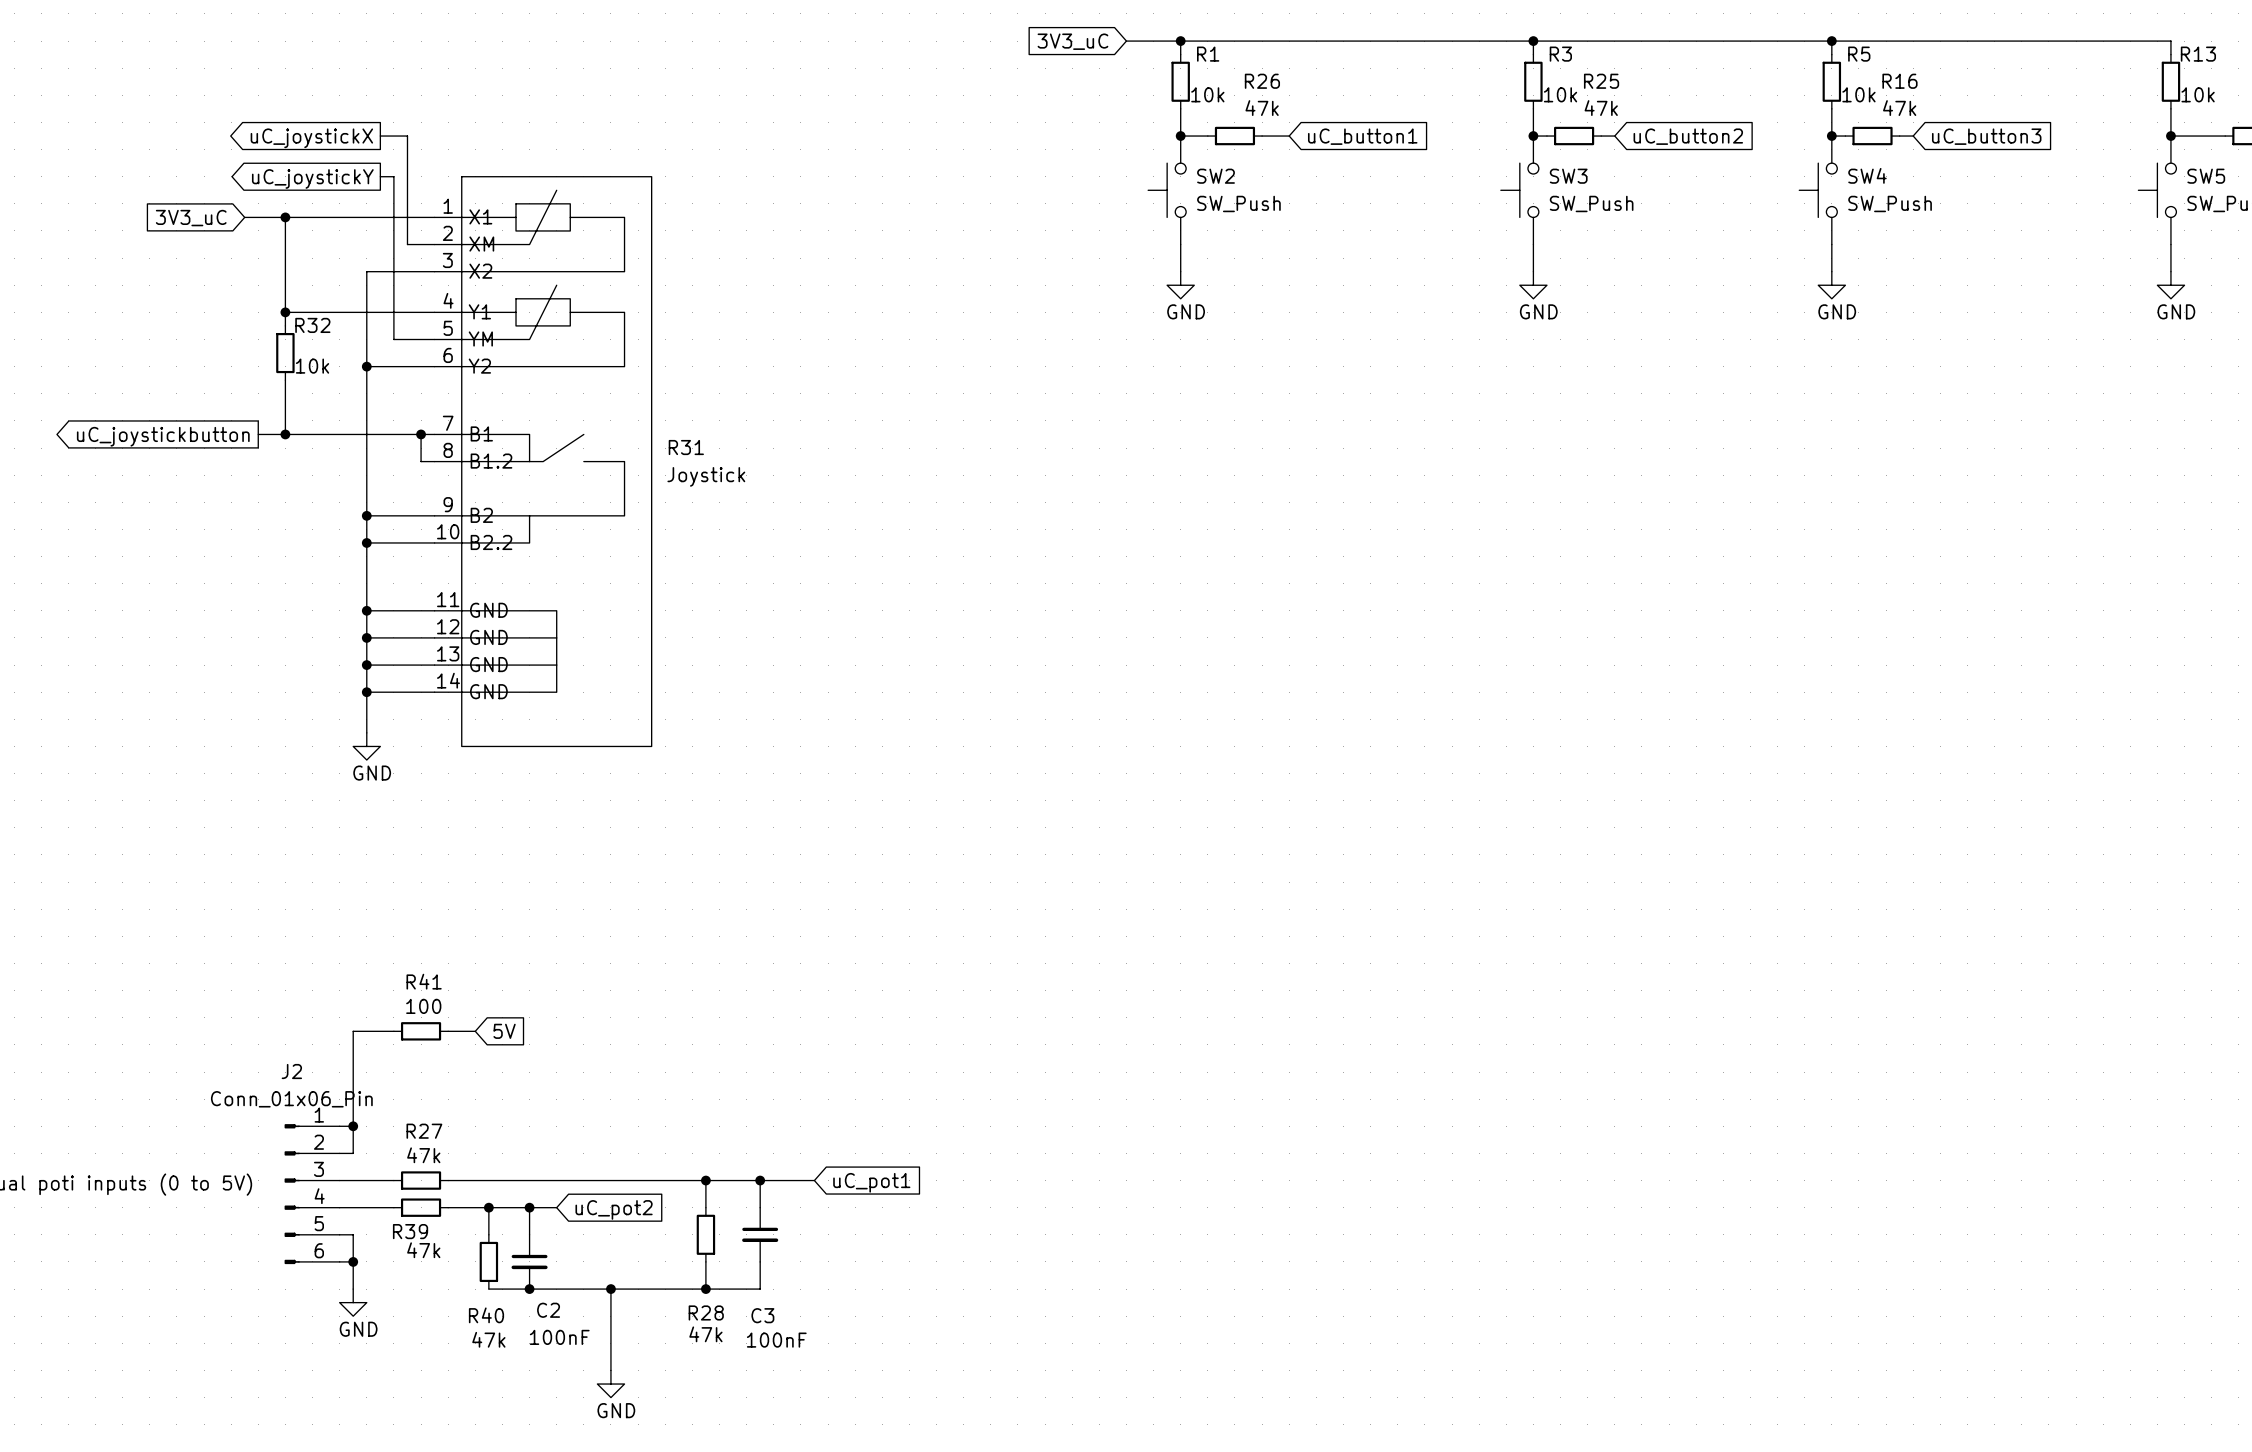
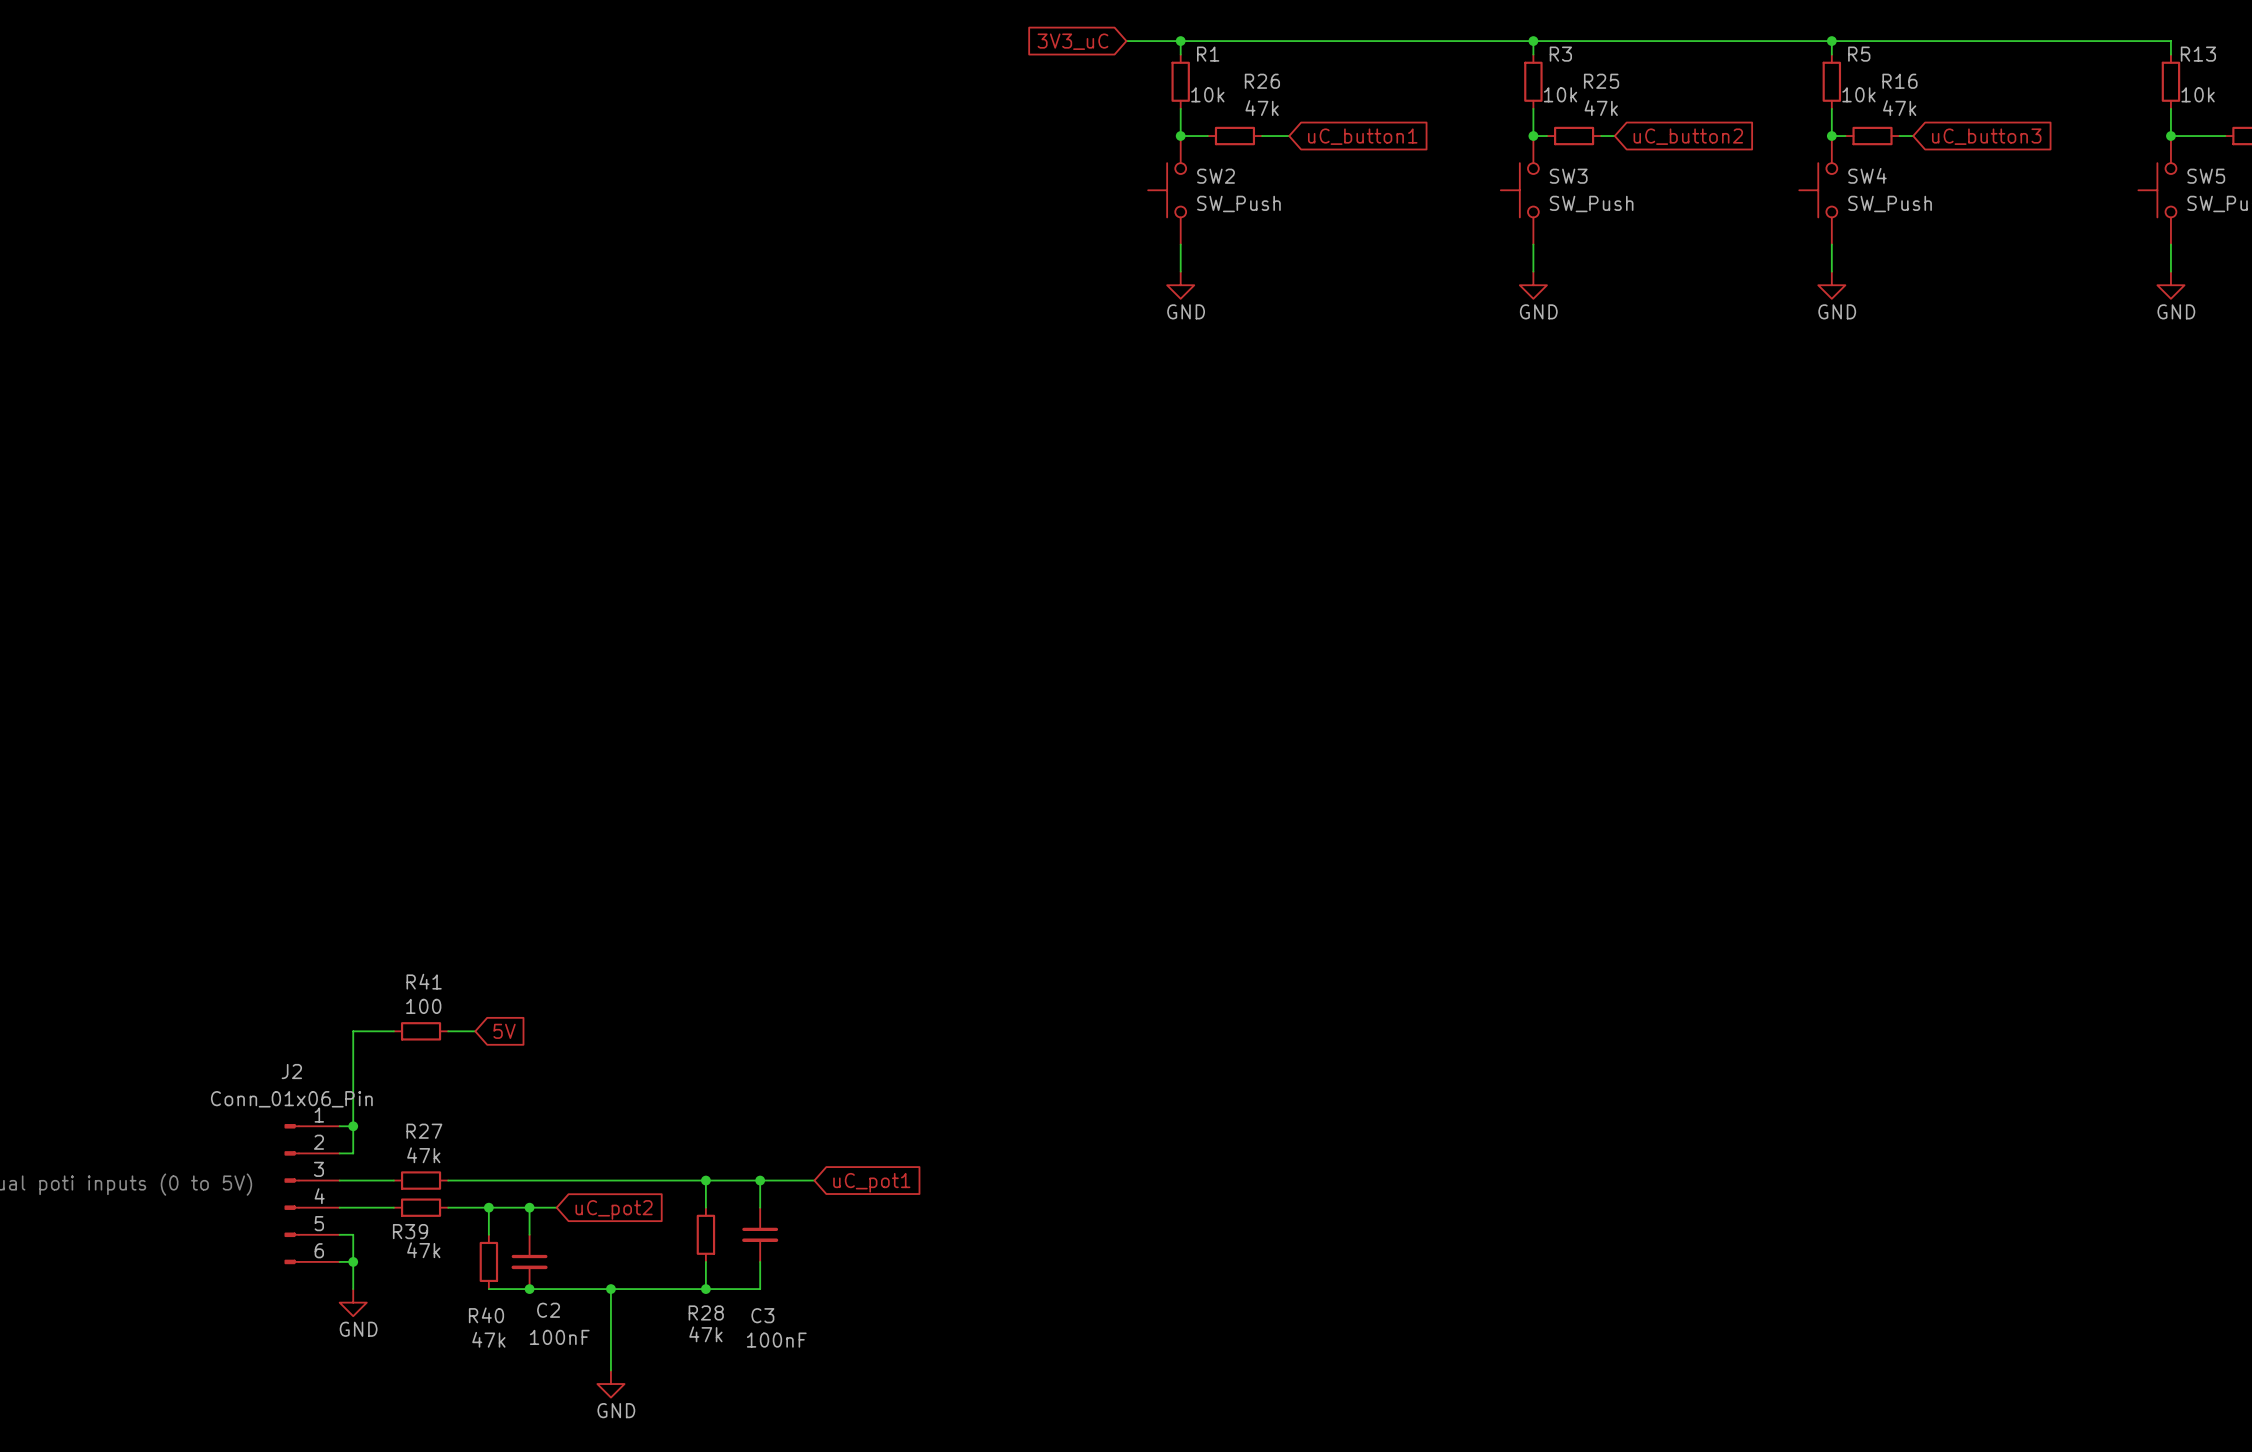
wire: (380, 136) (407, 136) (407, 244) (434, 244) -> none
global label: uC_joystickX (311, 138) -> none
wire: (380, 176) (393, 176) (393, 339) (434, 339) -> none
global label: uC_joystickY (312, 178) -> none
wire: (244, 217) (434, 217) -> none
wire: (285, 217) (285, 325) -> none
junction: (285, 217) -> none
global label: 3V3_uC (191, 218) -> none
wire: (434, 271) (366, 271) (366, 732) -> none
wire: (285, 312) (434, 312) -> none
junction: (285, 312) -> none
R32: 10k (285, 353) -> none
wire: (366, 366) (434, 366) -> none
junction: (366, 366) -> none
wire: (285, 380) (285, 434) -> none
wire: (258, 434) (434, 434) -> none
junction: (285, 434) -> none
wire: (421, 434) (421, 461) (434, 461) -> none
junction: (421, 434) -> none
global label: uC_joystickbutton (163, 436) -> none
R31: Joystick (543, 461) -> none
wire: (366, 515) (434, 515) -> none
junction: (366, 515) -> none
wire: (366, 542) (434, 542) -> none
junction: (366, 542) -> none
wire: (366, 610) (434, 610) -> none
junction: (366, 610) -> none
wire: (366, 637) (434, 637) -> none
junction: (366, 637) -> none
wire: (366, 665) (434, 665) -> none
junction: (366, 665) -> none
wire: (366, 692) (434, 692) -> none
junction: (366, 692) -> none
power symbol: GND (366, 746) -> none

